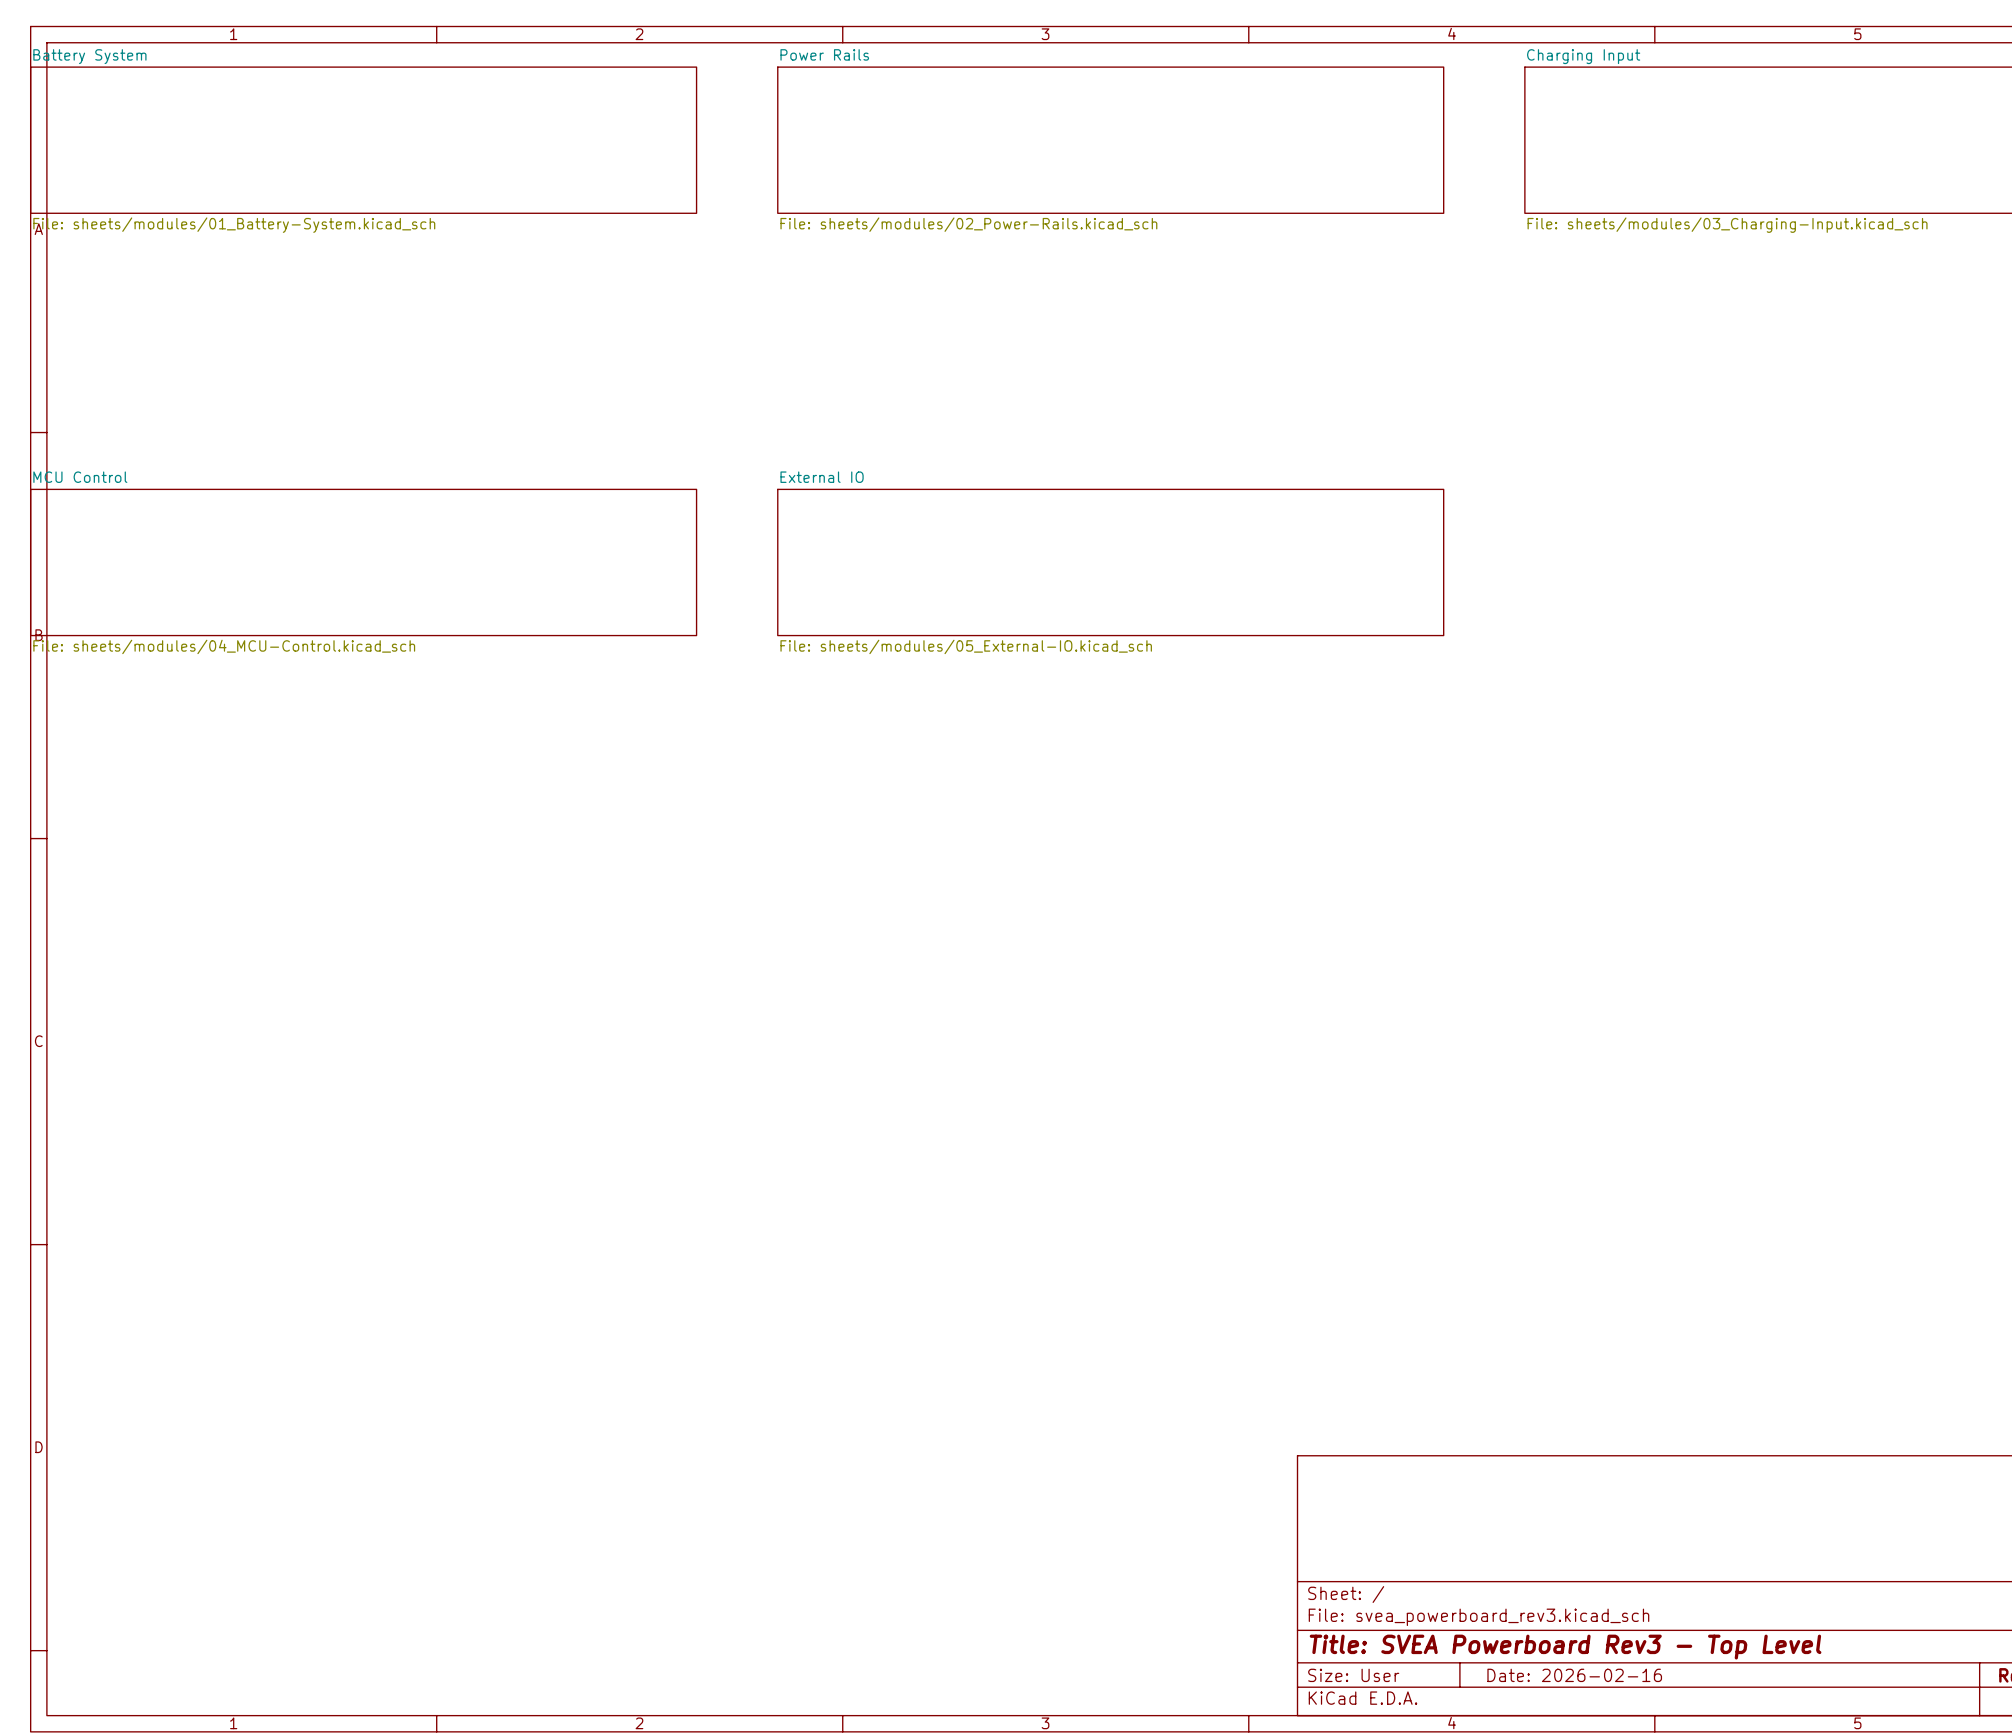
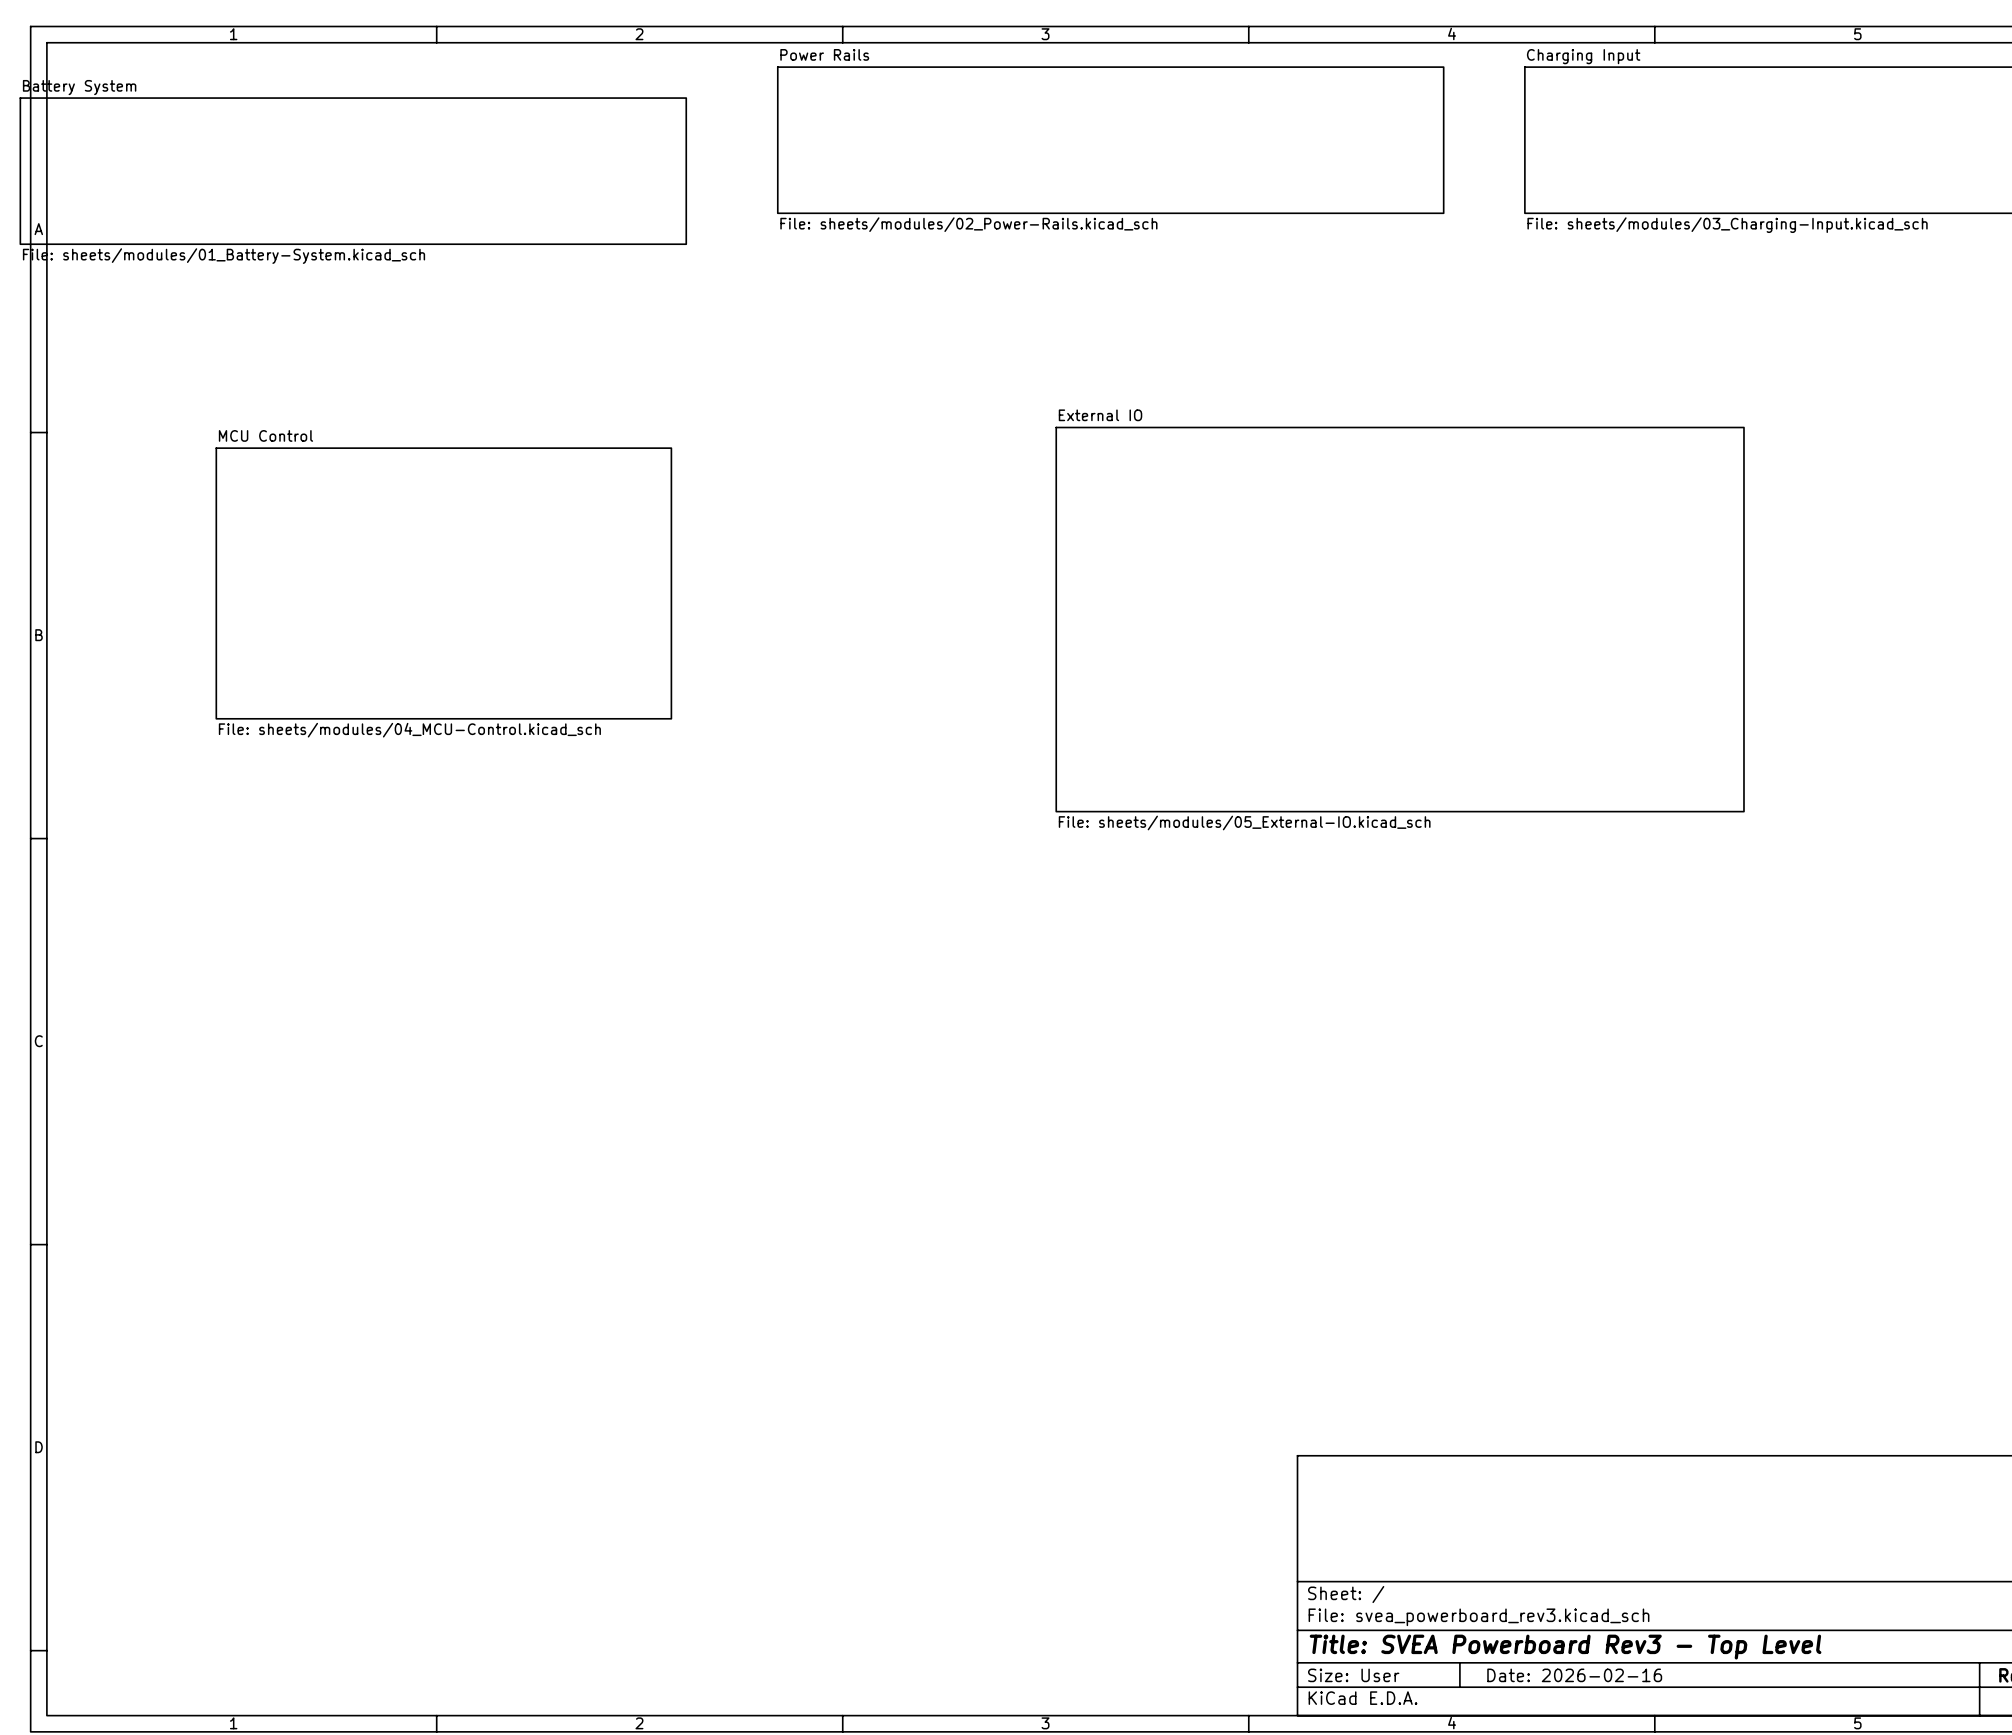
sheet Battery System position: (363, 140) -> (353, 171)
sheet MCU Control: File: sheets/modules/04_MCU-Control.kicad_sch (363, 562) -> none
sheet External IO: File: sheets/modules/05_External-IO.kicad_sch (1110, 562) -> none
sheet MCU Control: none -> File: sheets/modules/04_MCU-Control.kicad_sch (443, 583)
sheet External IO: none -> File: sheets/modules/05_External-IO.kicad_sch (1400, 619)

